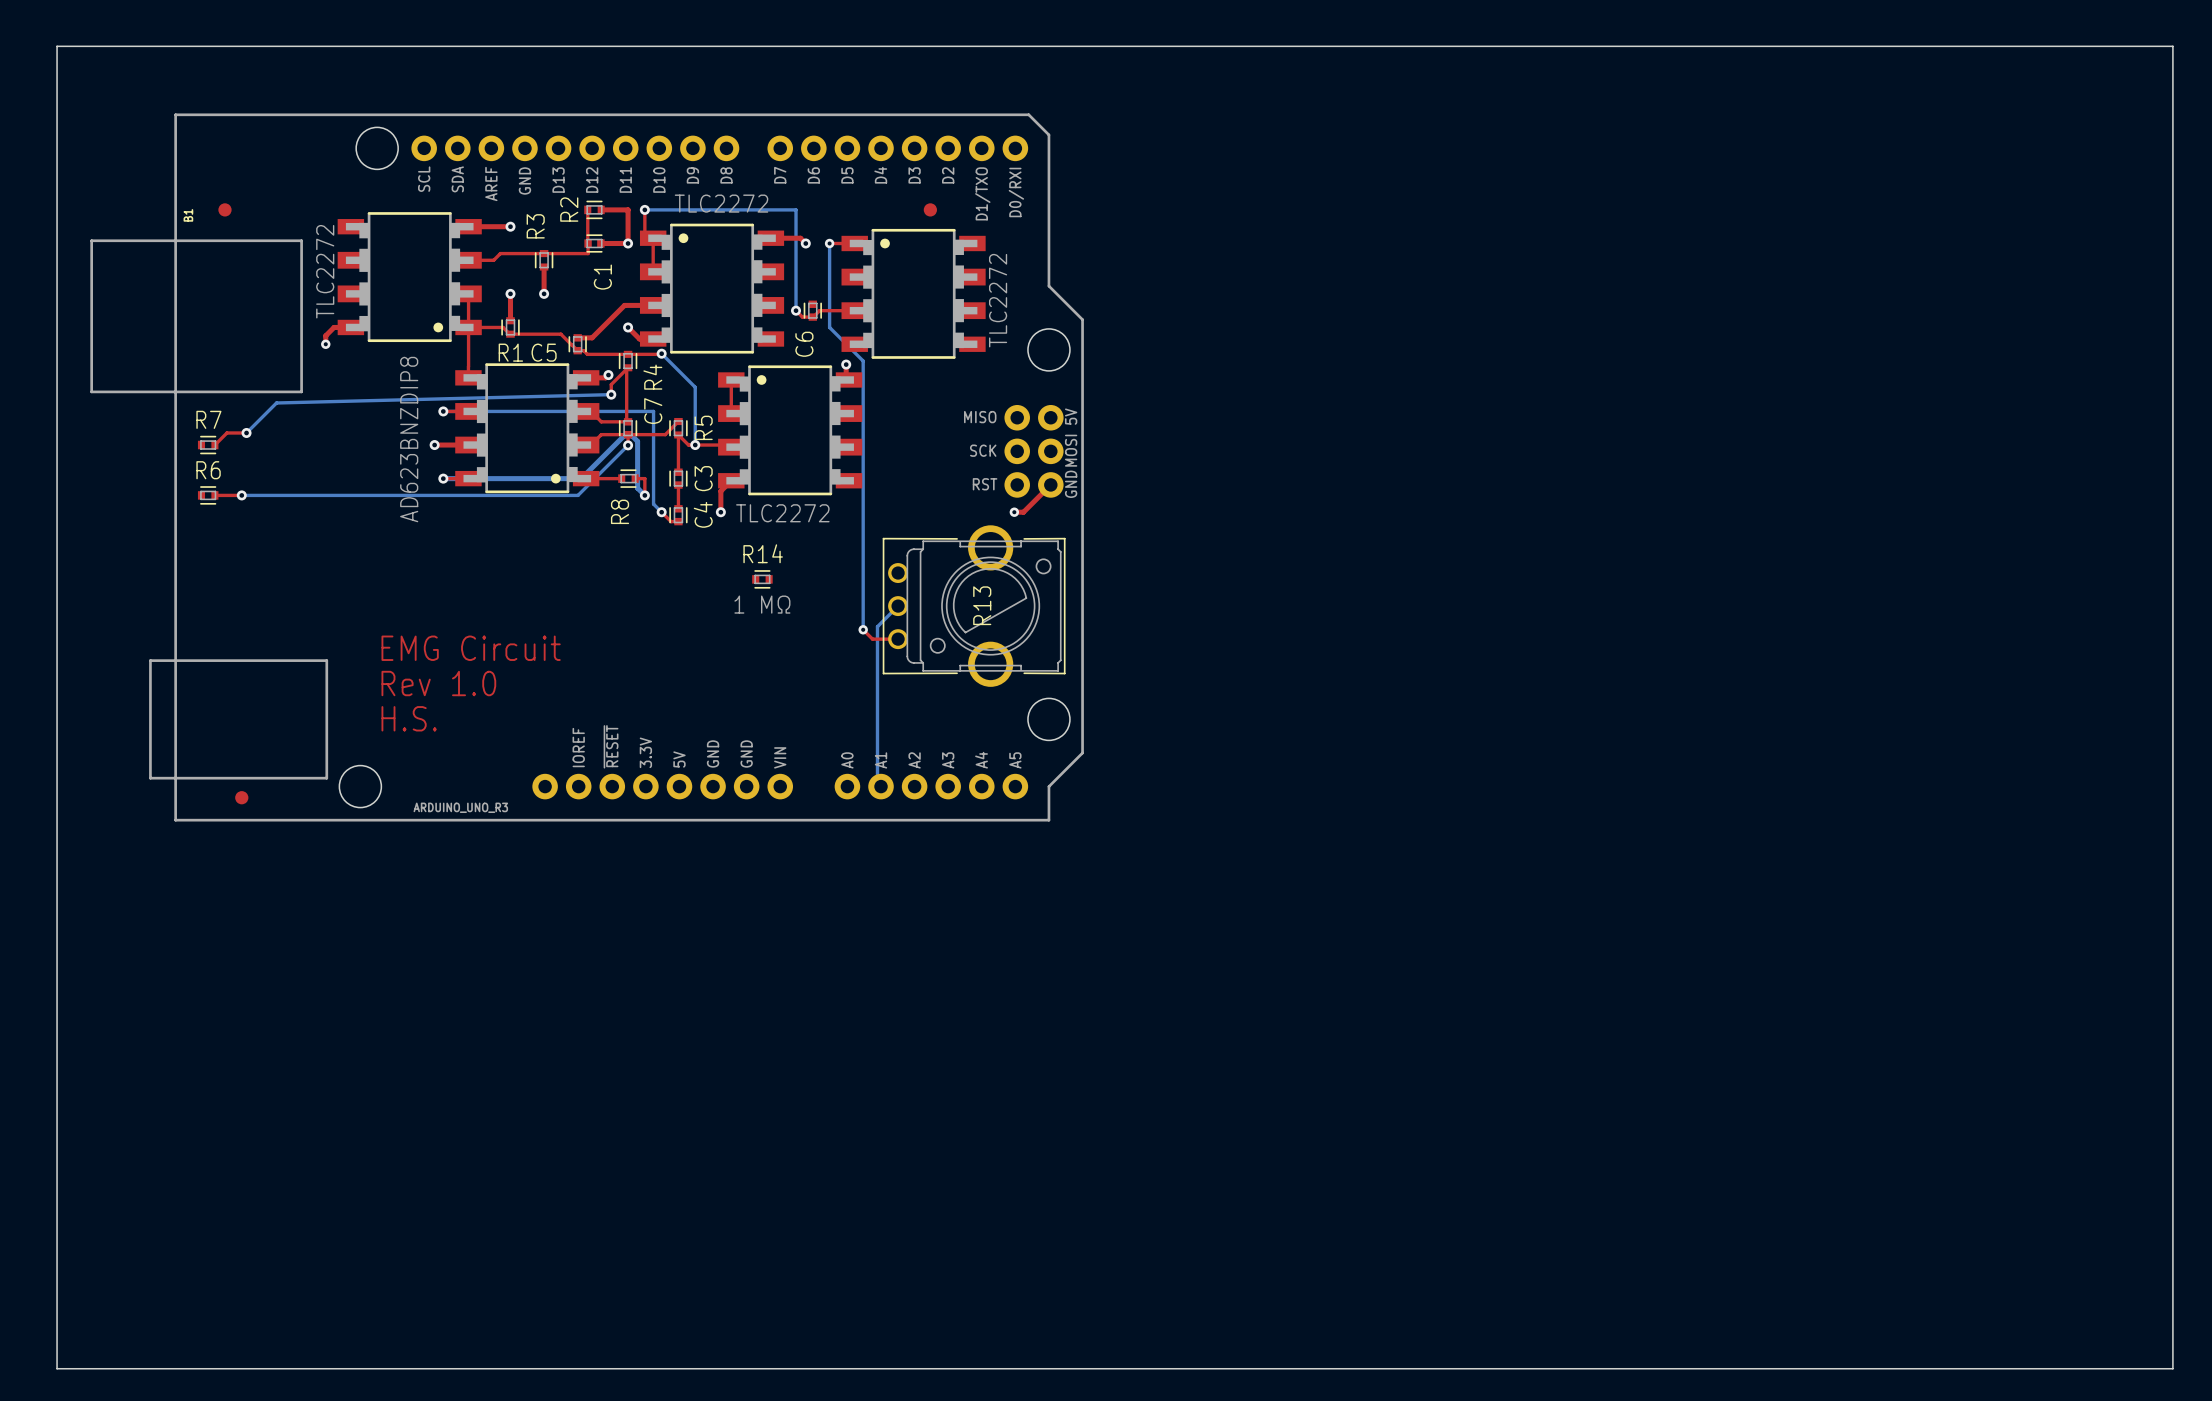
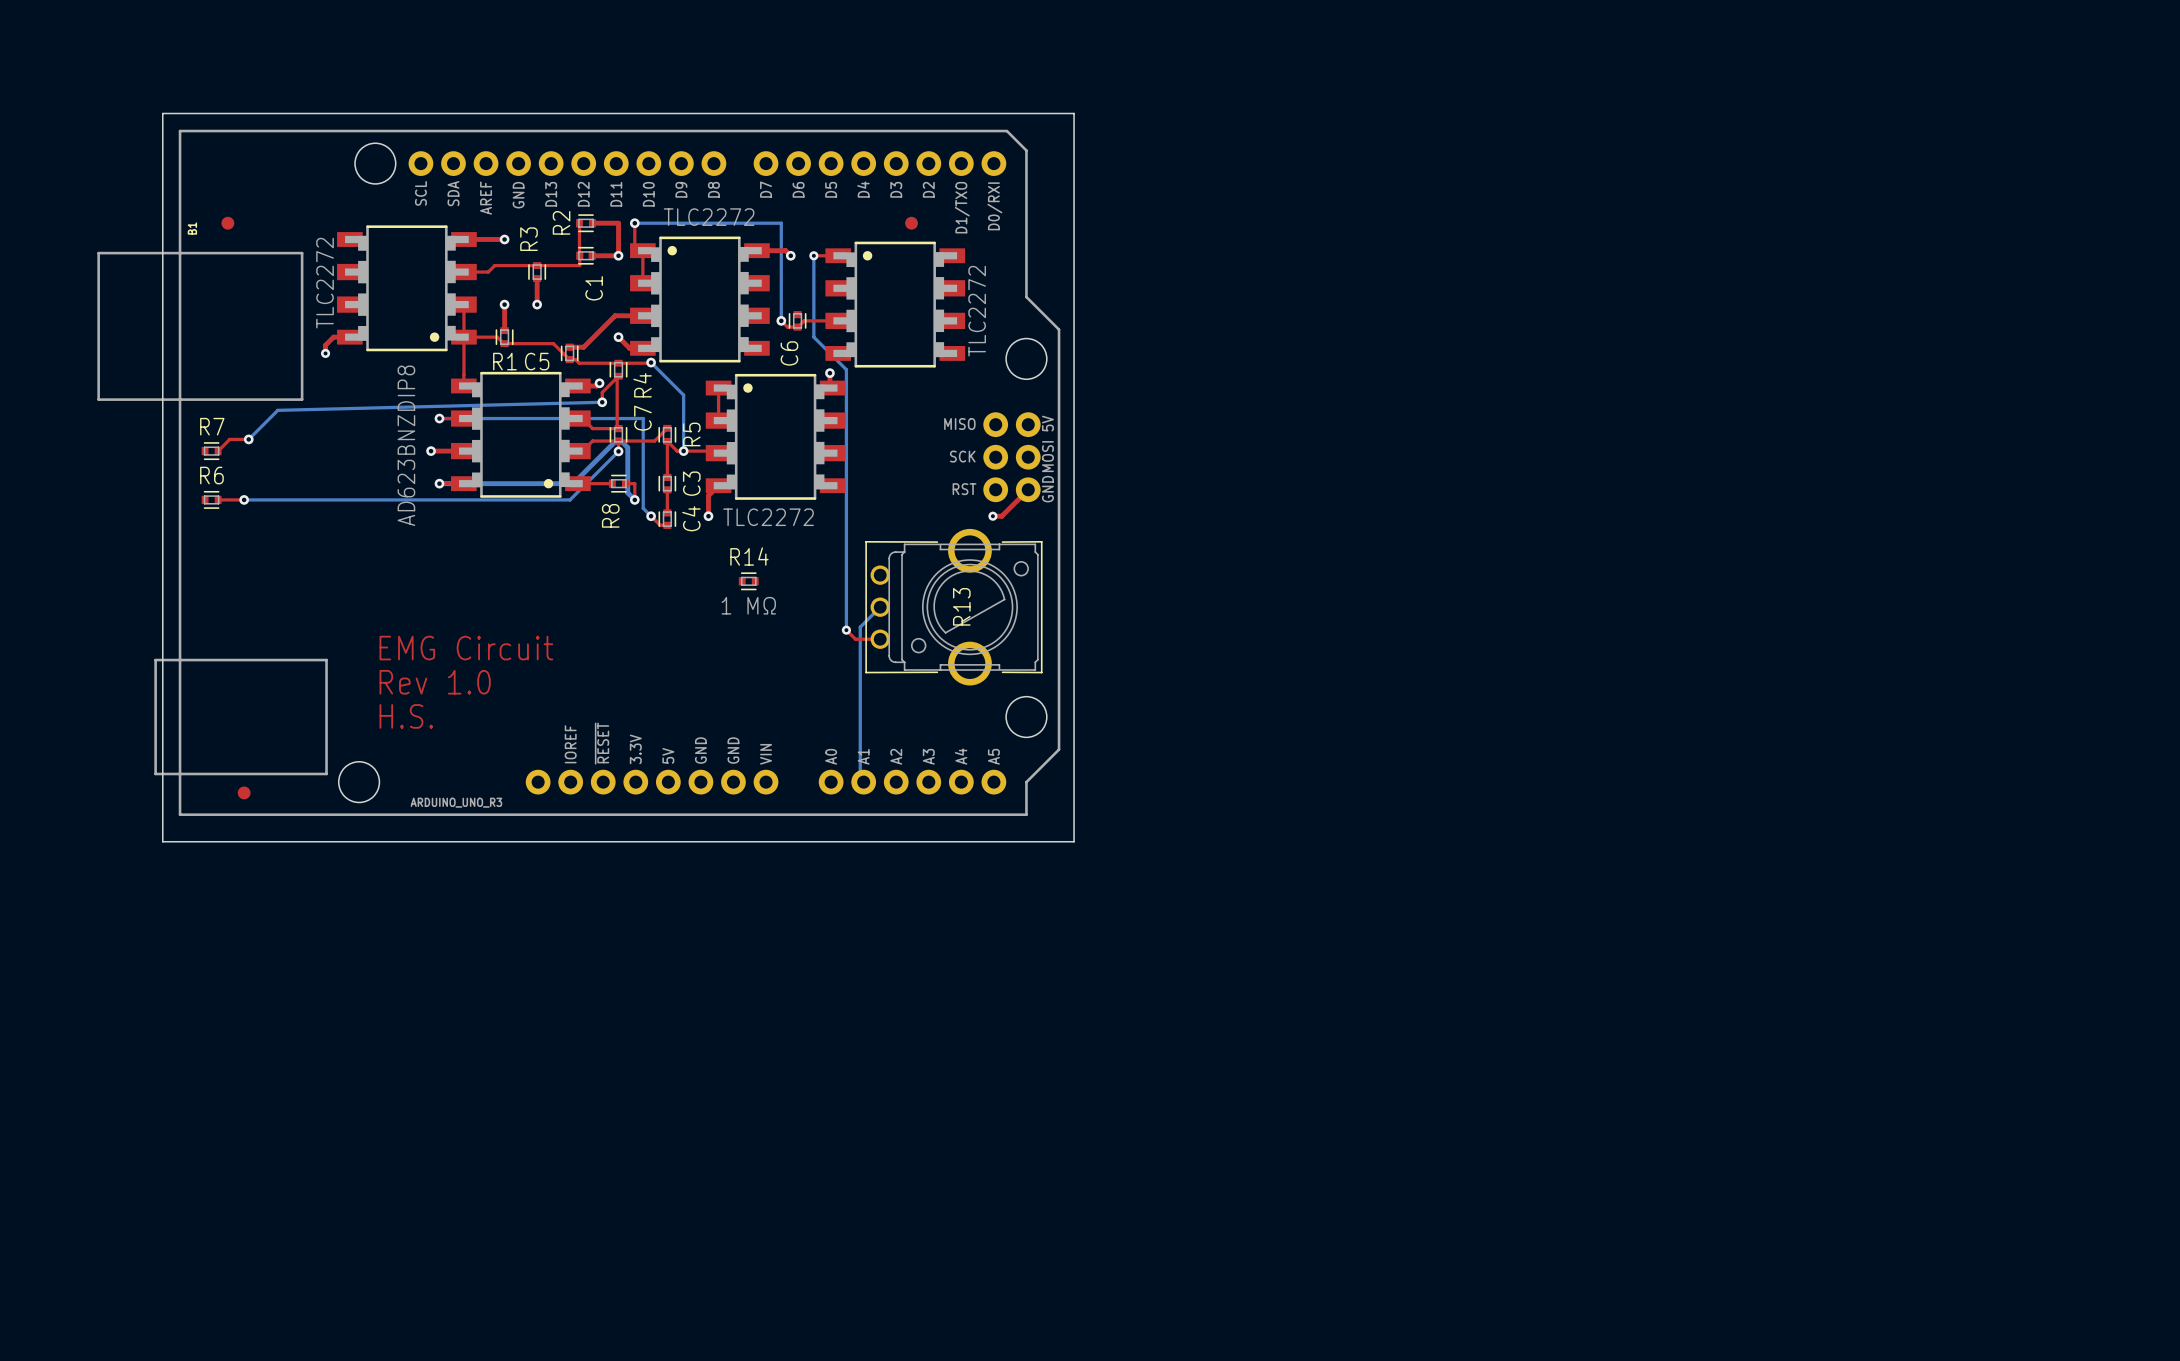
board edge: (57, 46) (2172, 46) (2172, 1368) (57, 1368) (57, 46) -> none
board edge: none -> (162, 113) (1074, 113) (1074, 841) (162, 841) (162, 113)

